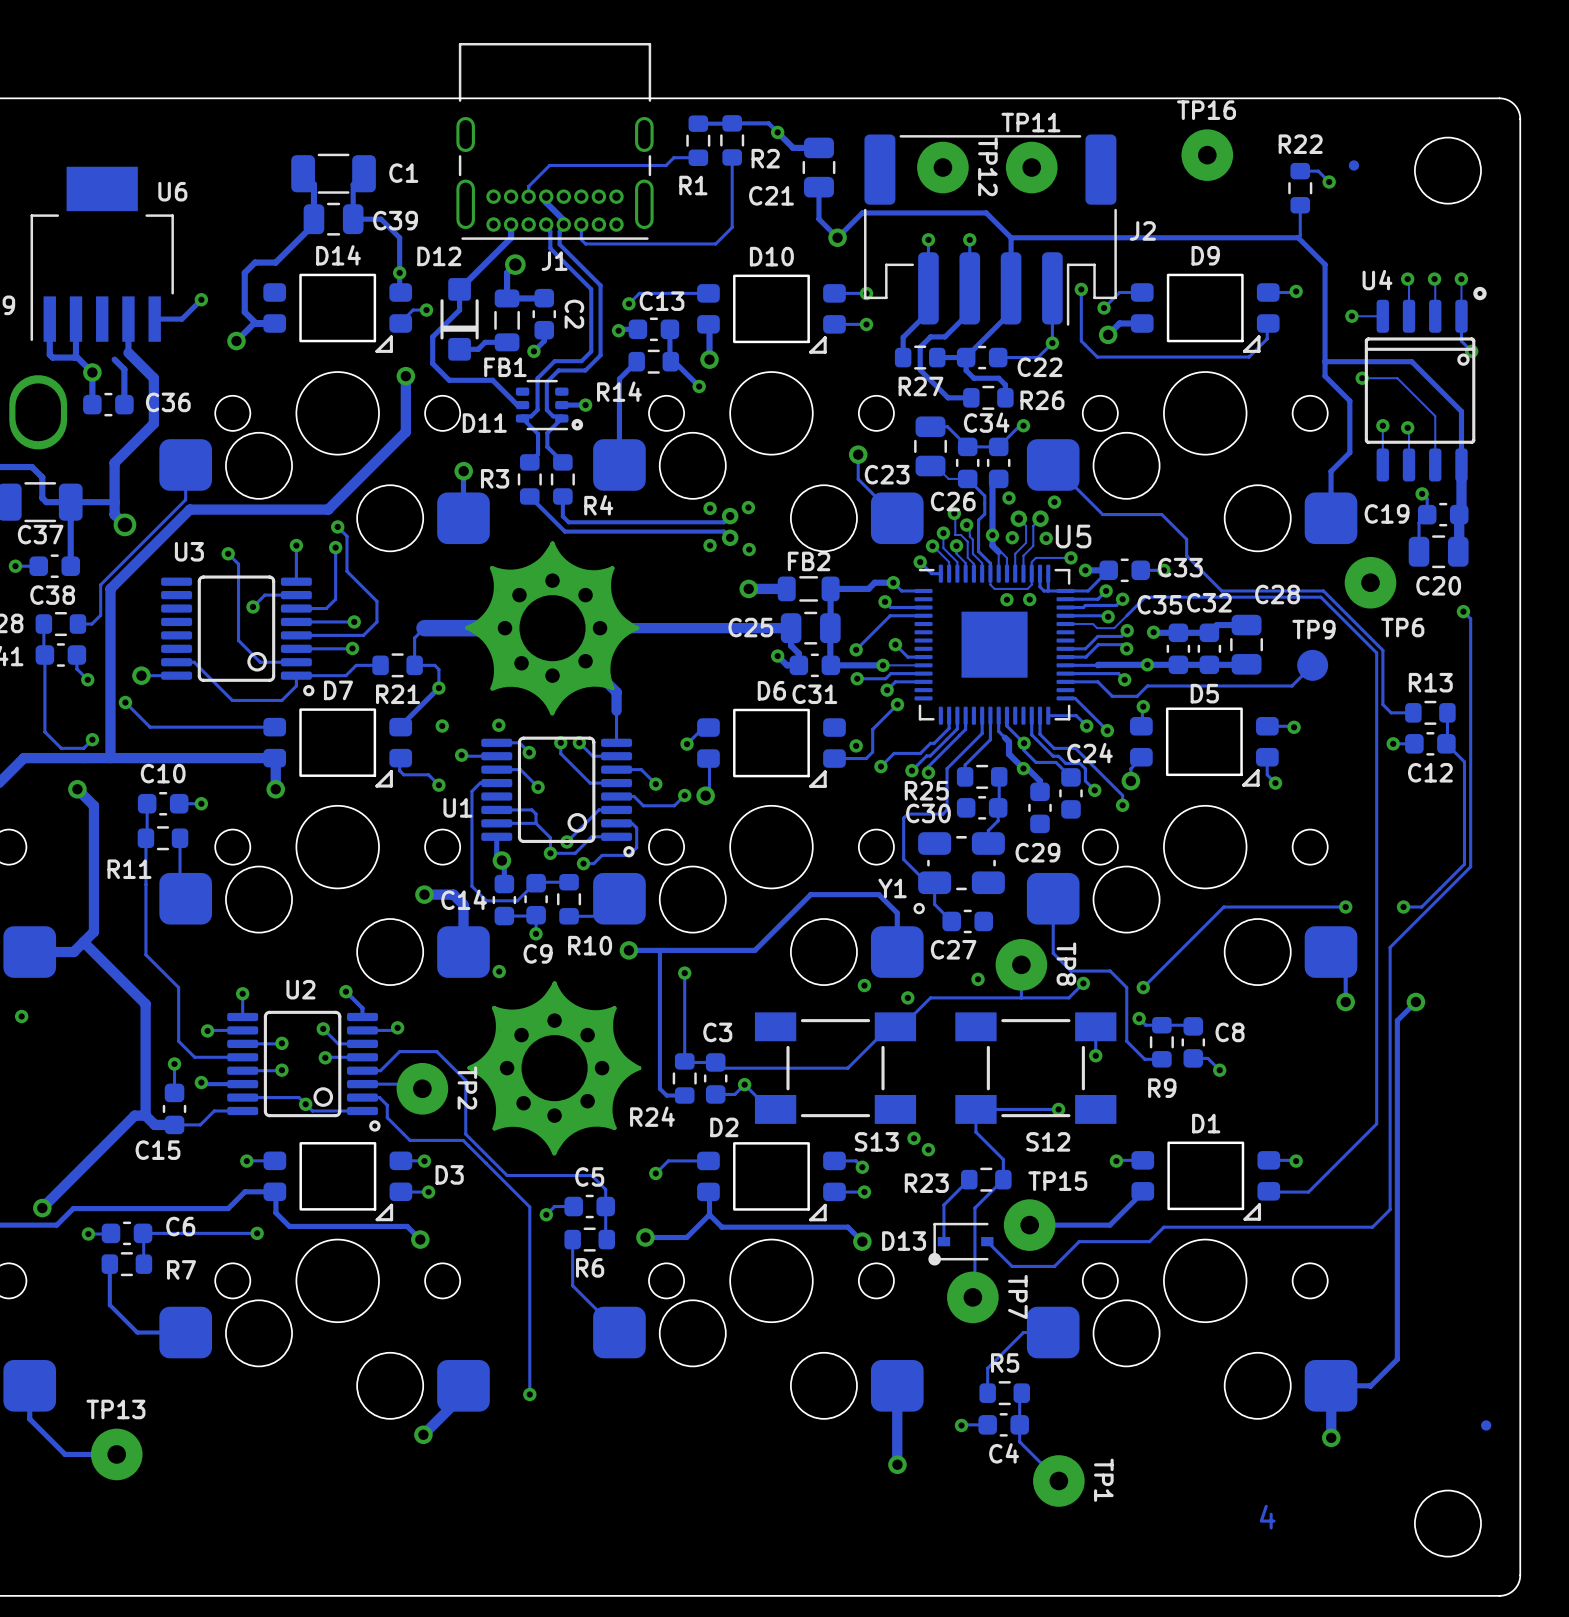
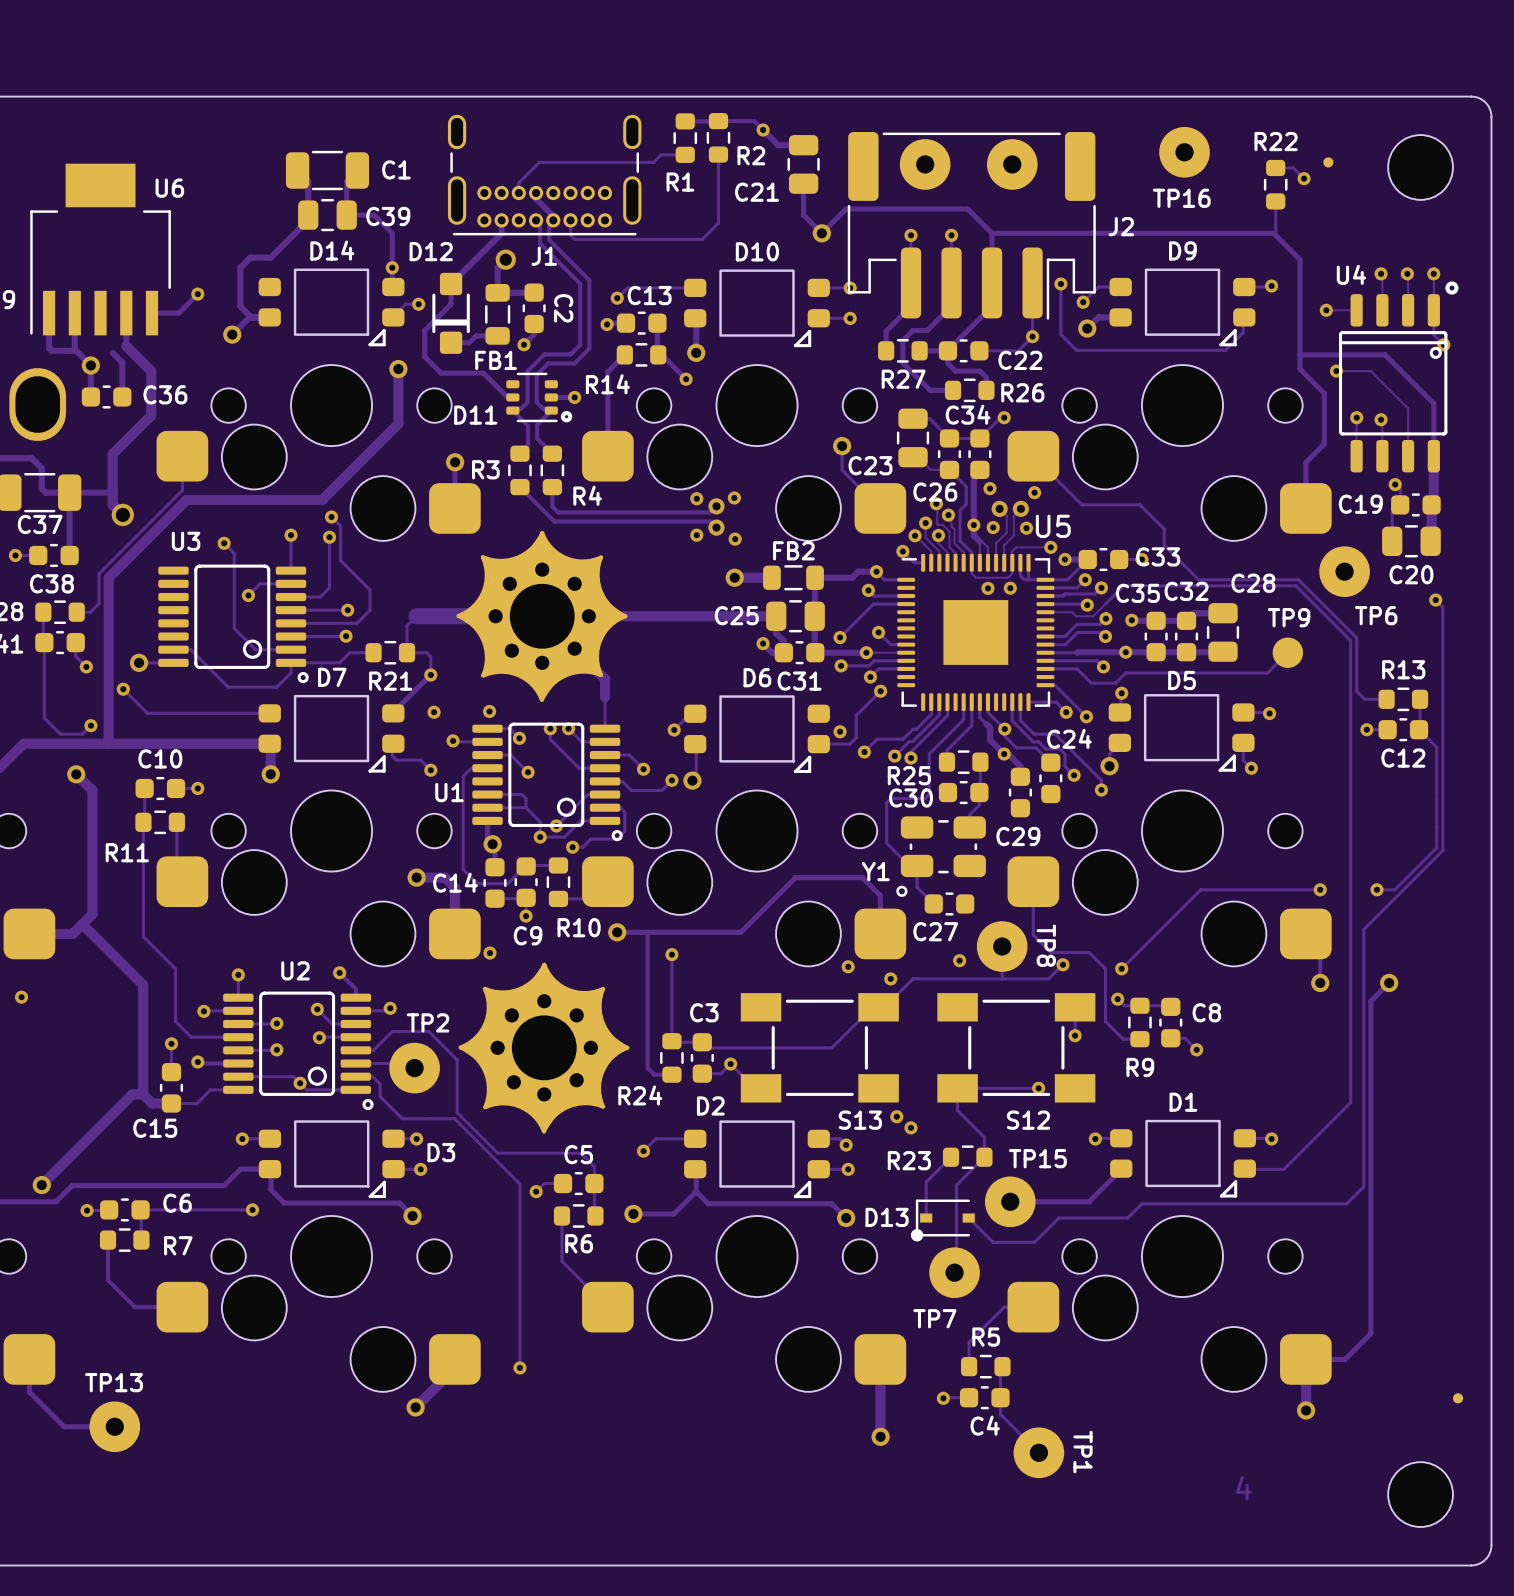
J1 footprint: [456, 42, 654, 240] -> [447, 114, 642, 236]
TP16 name position: TP16 (1206, 110) -> TP16 (1181, 198)
TP11 name: TP11 (1030, 122) -> none
TP12 name: TP12 (987, 166) -> none
TP2 name rotation: 0° (467, 1088) -> 90° counterclockwise (428, 1022)
TP7 name rotation: 0° (1017, 1297) -> 90° counterclockwise (934, 1318)
TP7 name position: TP7 (1017, 1297) -> TP7 (934, 1318)

